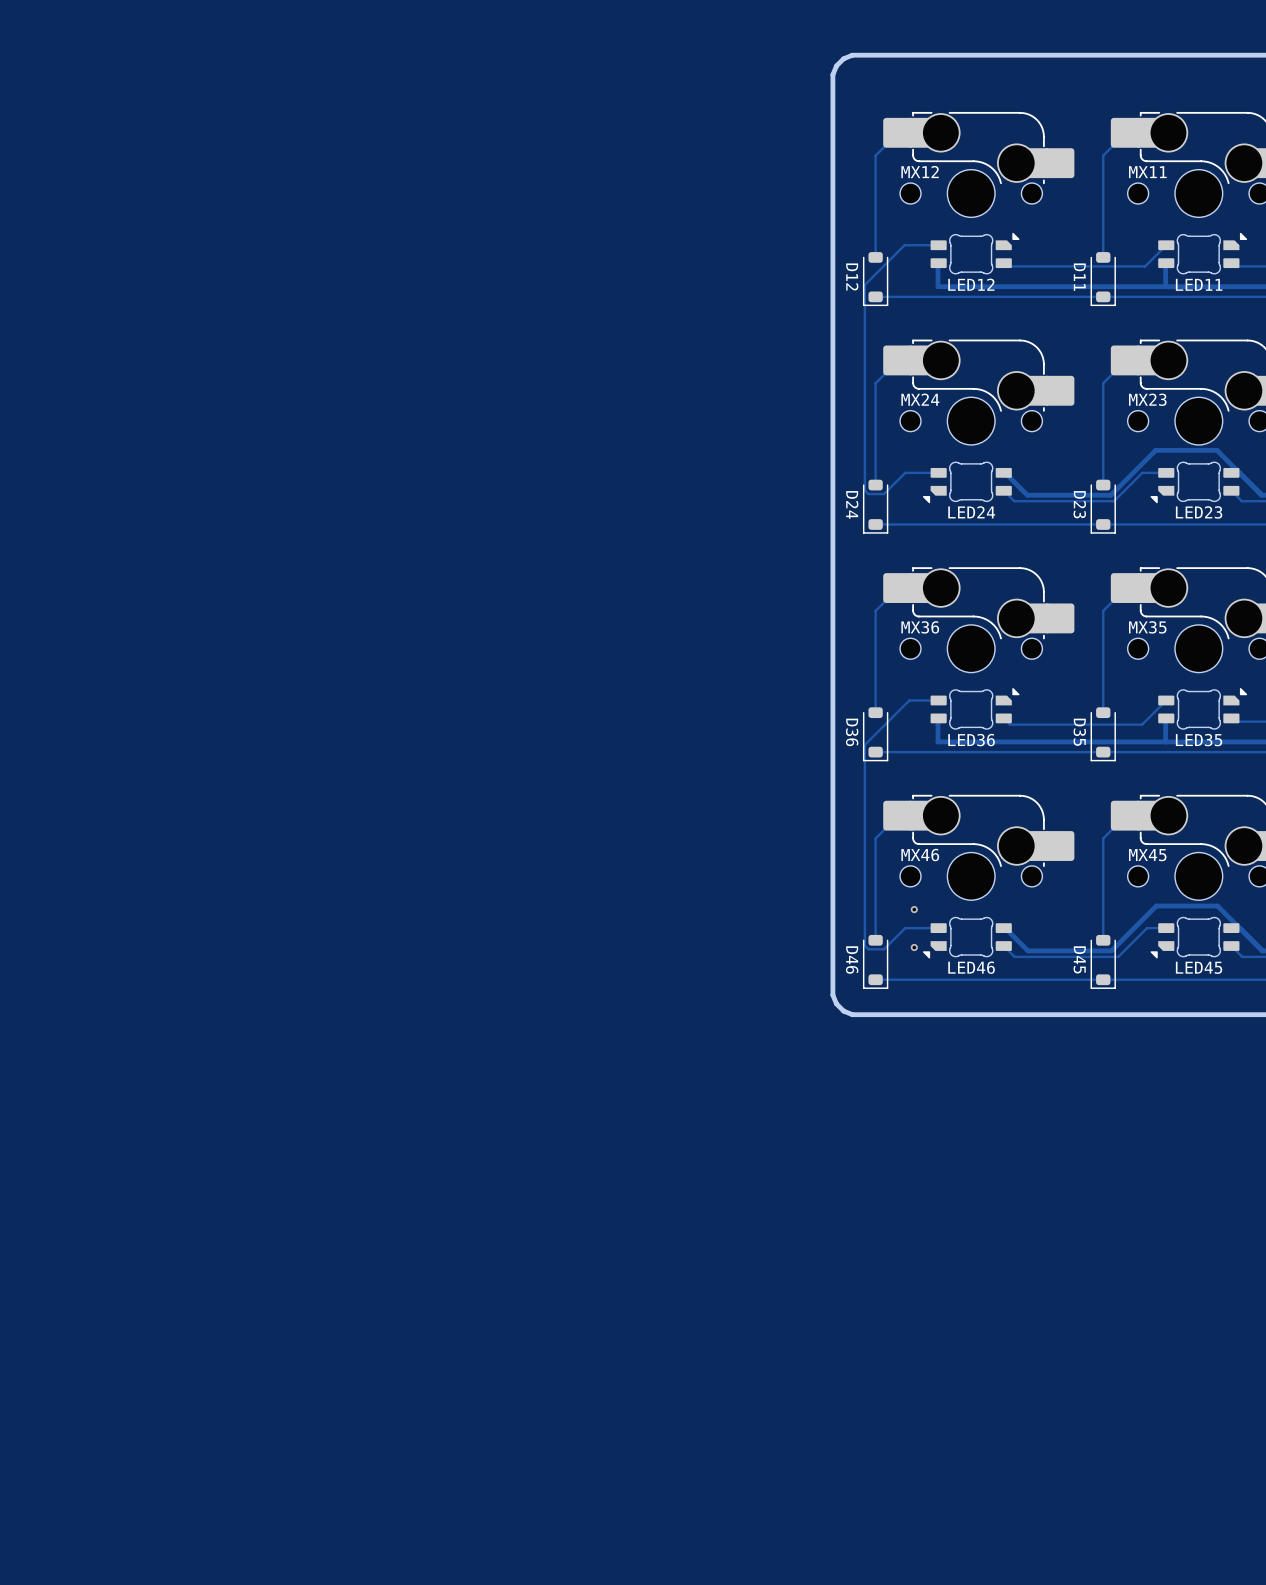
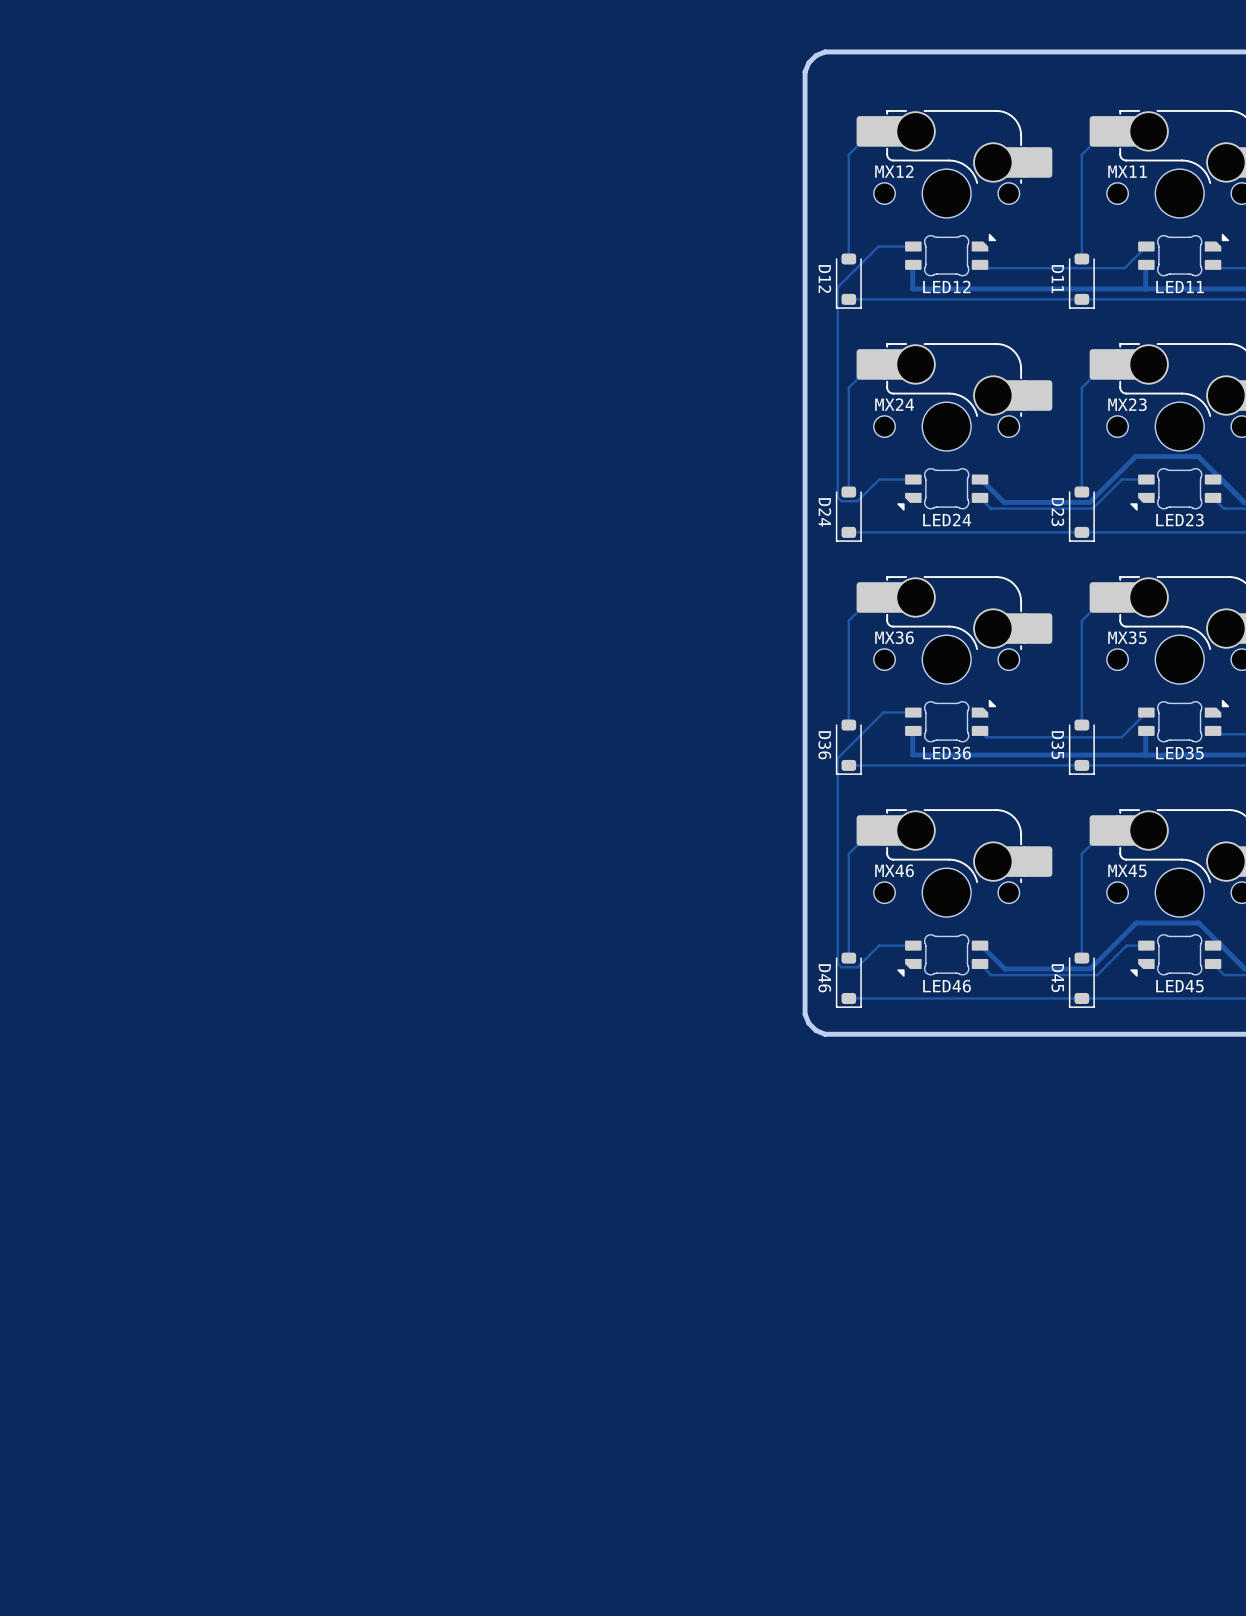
via: (914, 909) -> none
via: (914, 947) -> none

